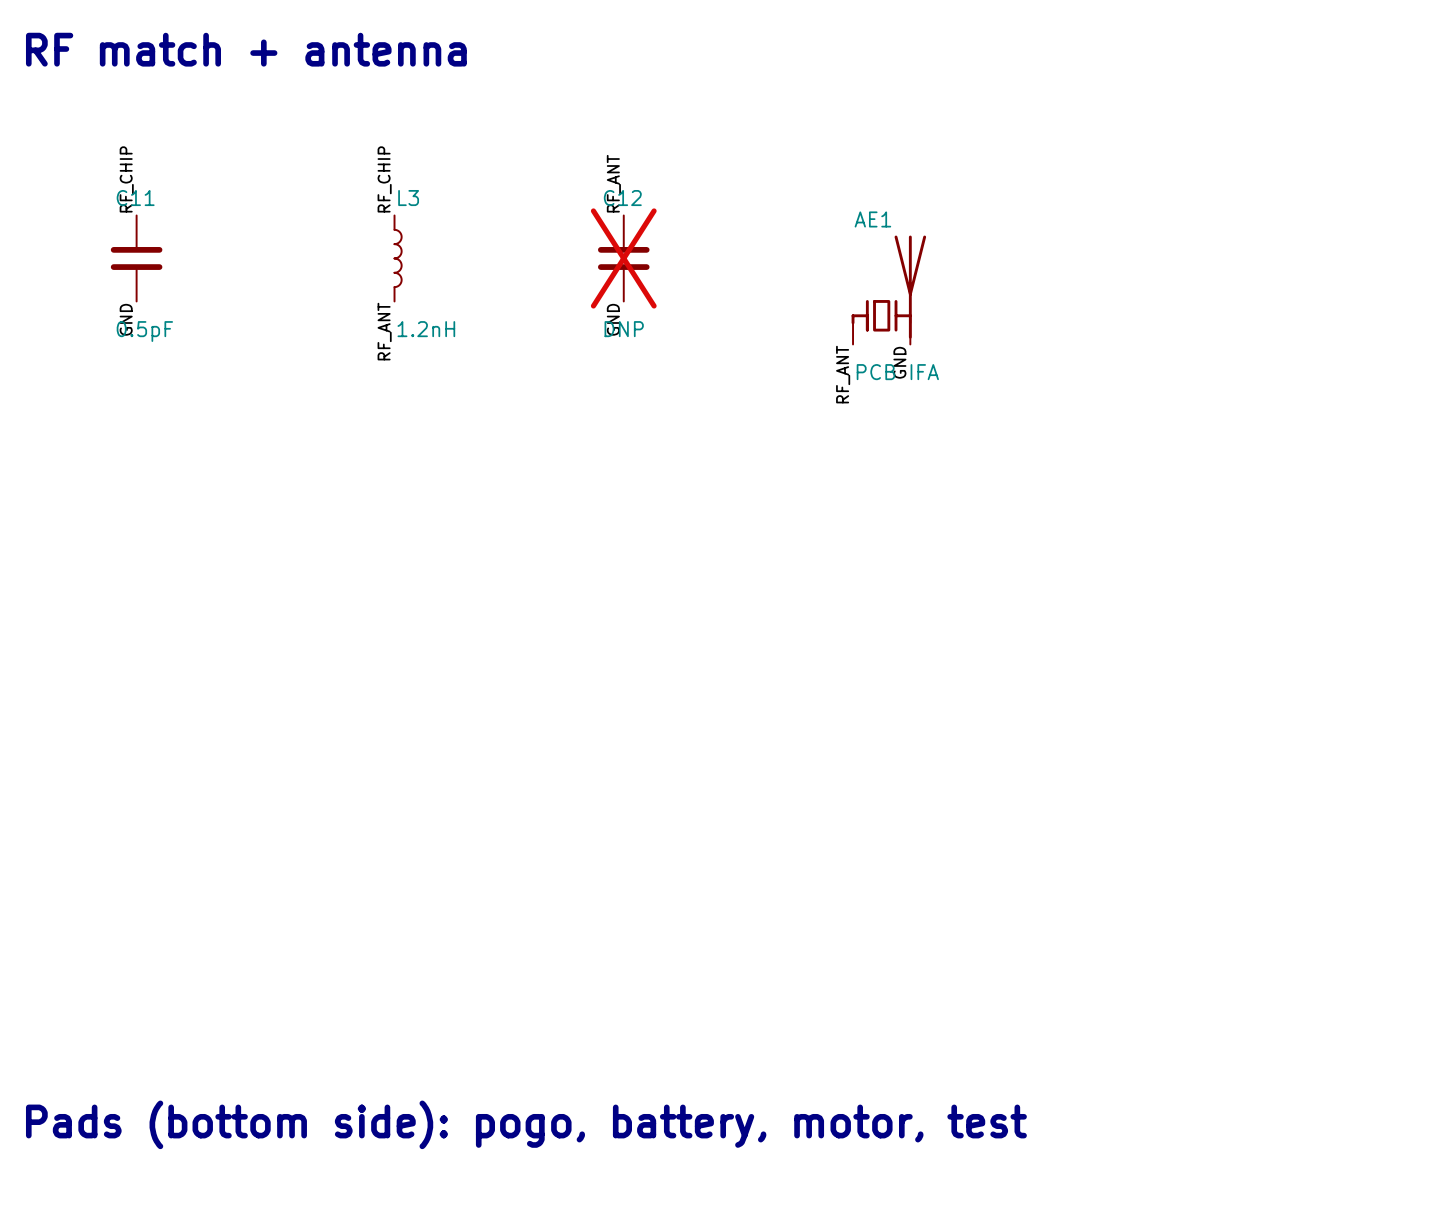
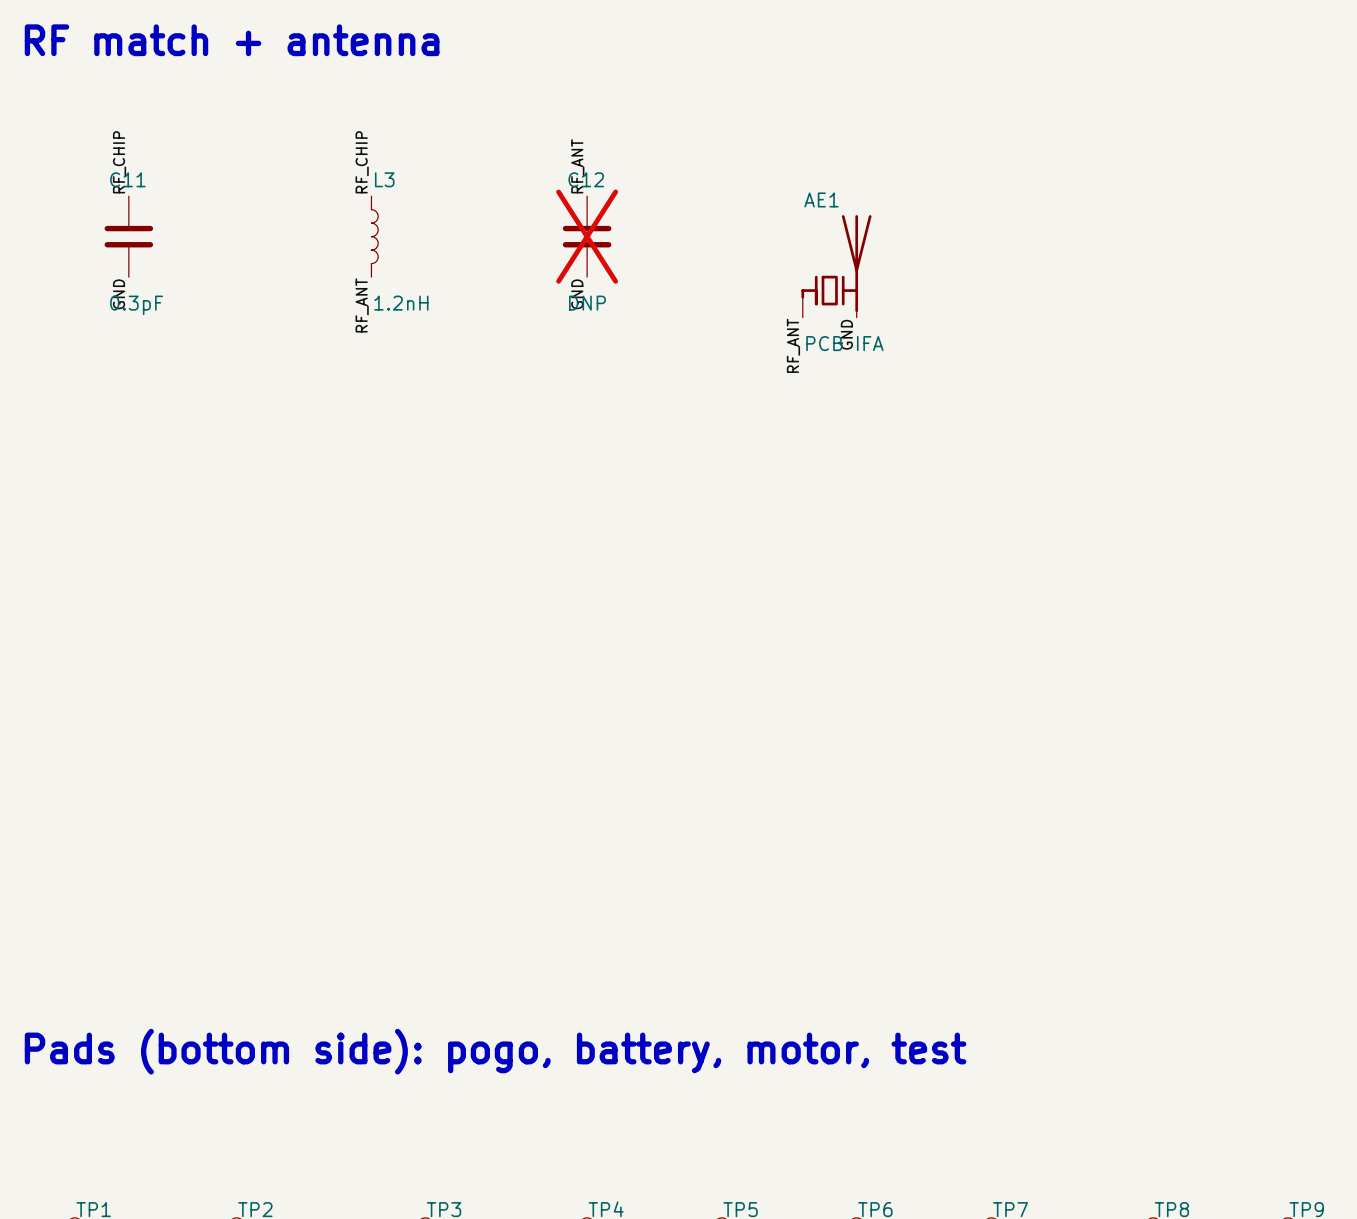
C11 value: 0.5pF (144, 331) -> 0.3pF (136, 305)

